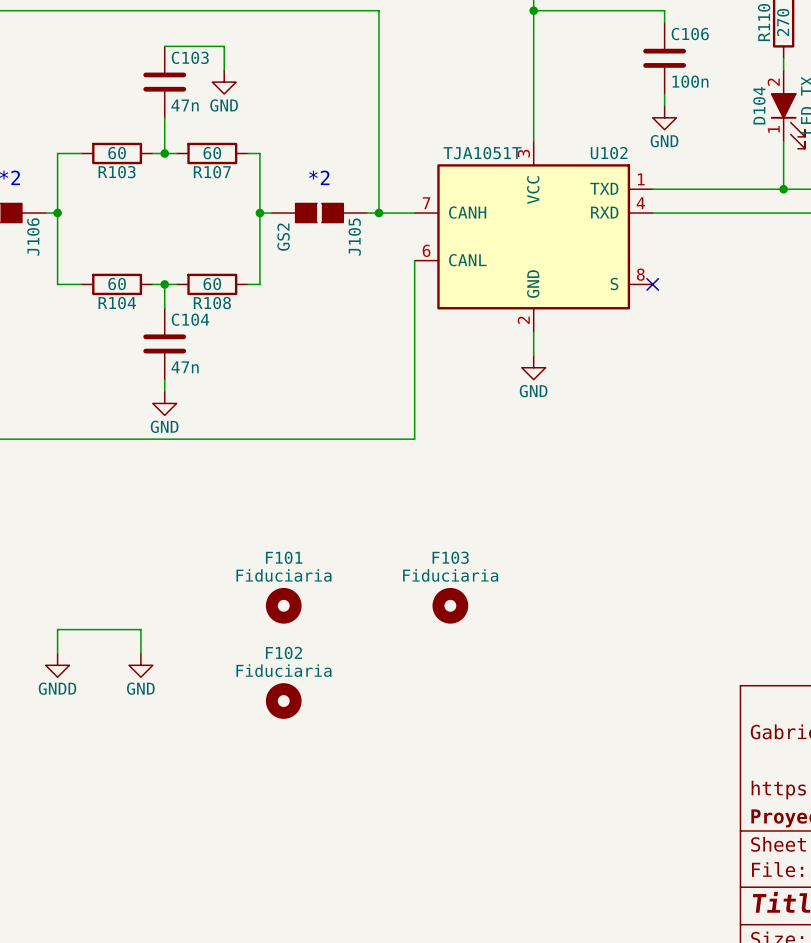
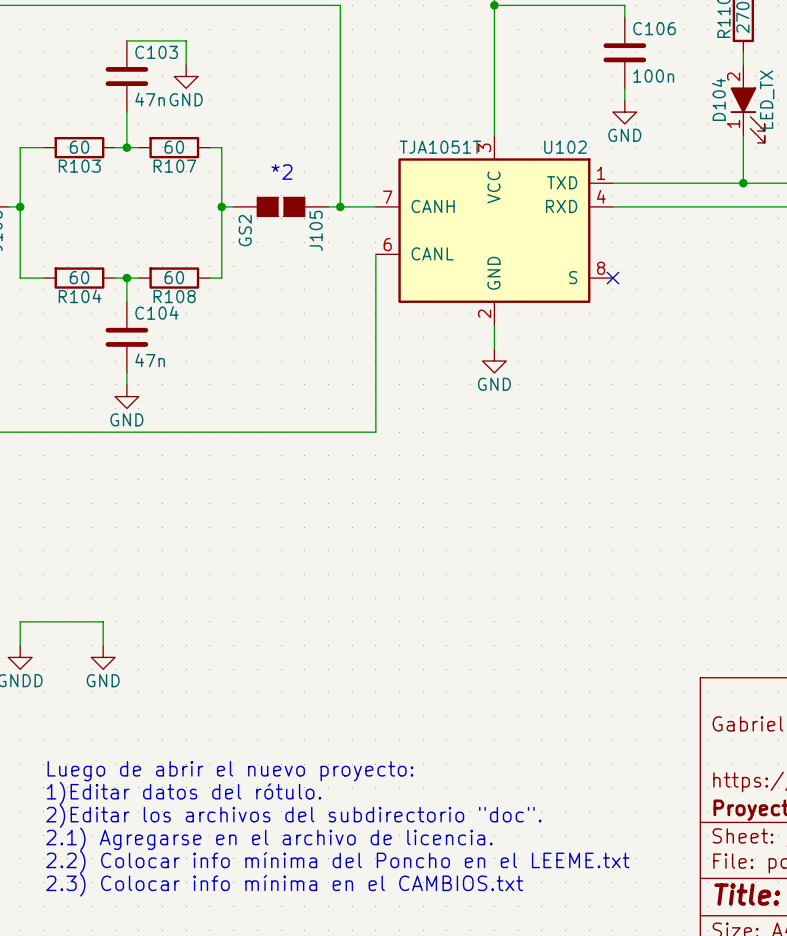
F101: Fiduciaria (283, 605) -> none
F103: Fiduciaria (450, 605) -> none
F102: Fiduciaria (283, 701) -> none
text: none -> Luego de abrir el nuevo proyecto: (230, 771)
text: none -> 1)Editar datos del rótulo. (184, 793)
text: none -> 2)Editar los archivos del subdirectorio "doc". (293, 816)
text: none -> 2.1) Agregarse en el archivo de licencia. (269, 839)
text: none -> 2.2) Colocar info mínima del Poncho en el LEEME.txt (337, 862)
text: none -> 2.3) Colocar info mínima en el CAMBIOS.txt (284, 885)

